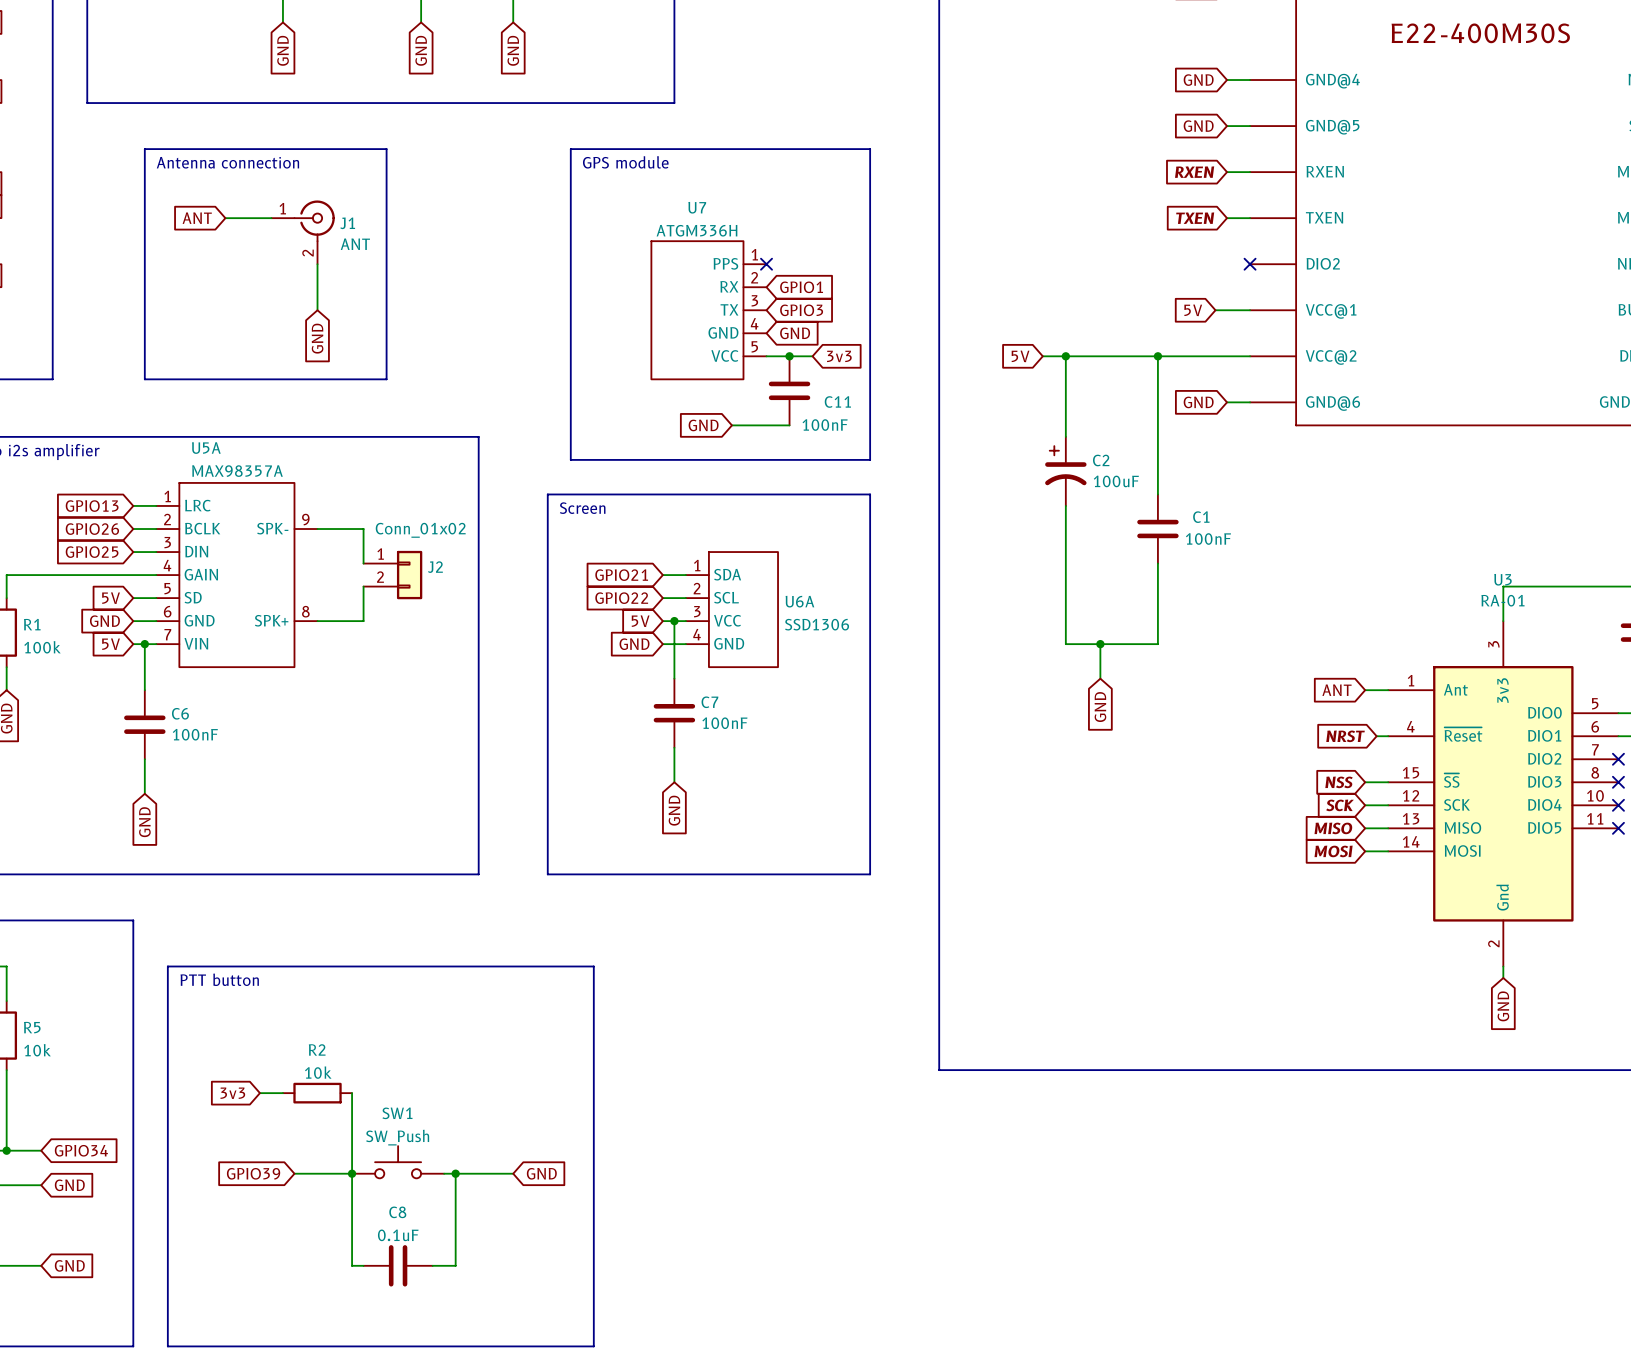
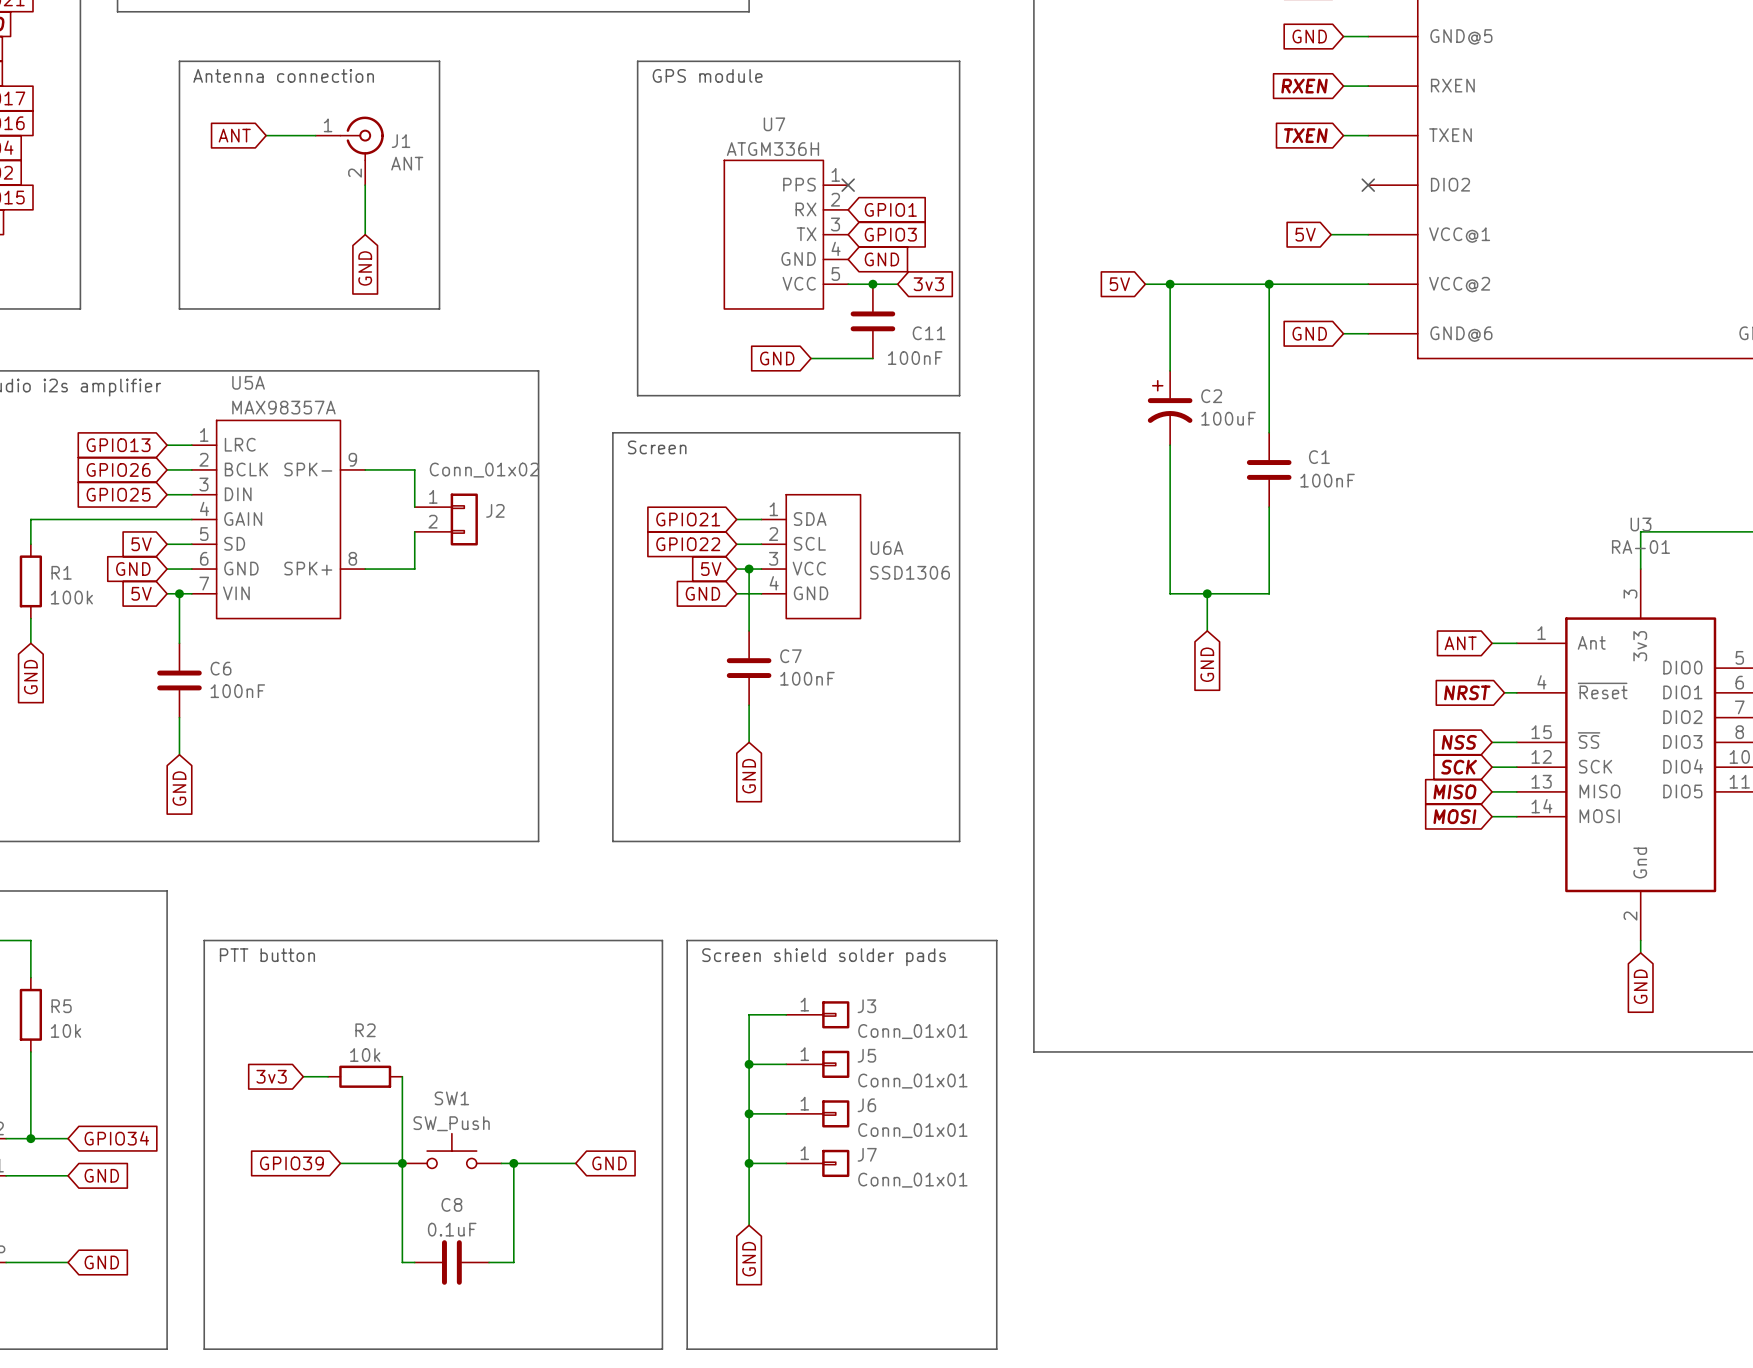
line: none -> (687, 940) (996, 940) (996, 1349) (687, 1349) (687, 940)
text: none -> Screen shield solder pads (824, 957)
wire: none -> (786, 1014) (749, 1014) (749, 1225)
J3: none -> Conn_01x01 (817, 1014)
wire: none -> (749, 1064) (786, 1064)
junction: none -> (749, 1064)
J5: none -> Conn_01x01 (817, 1064)
wire: none -> (749, 1113) (786, 1113)
junction: none -> (749, 1113)
J6: none -> Conn_01x01 (817, 1113)
wire: none -> (749, 1163) (786, 1163)
junction: none -> (749, 1163)
J7: none -> Conn_01x01 (817, 1163)
global label: none -> GND (749, 1259)

